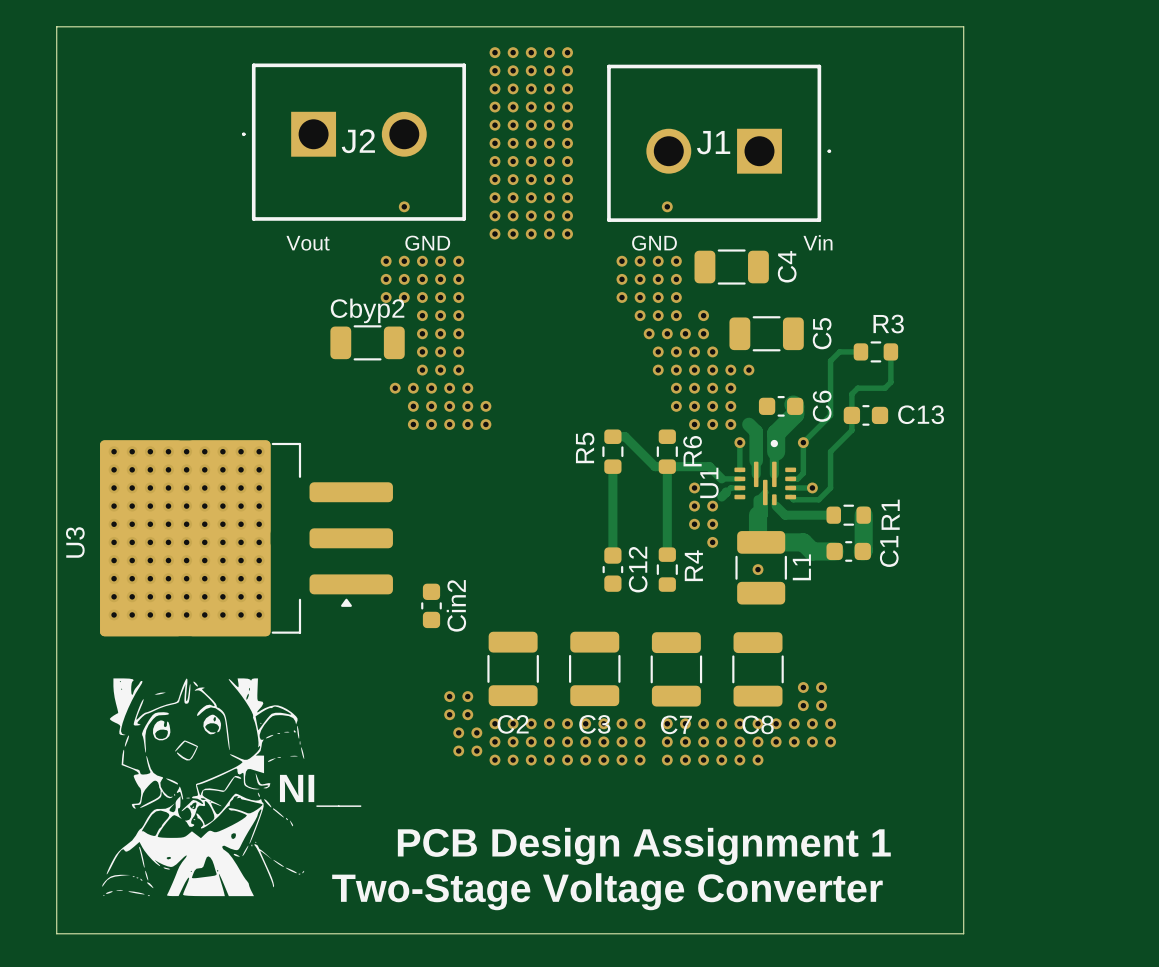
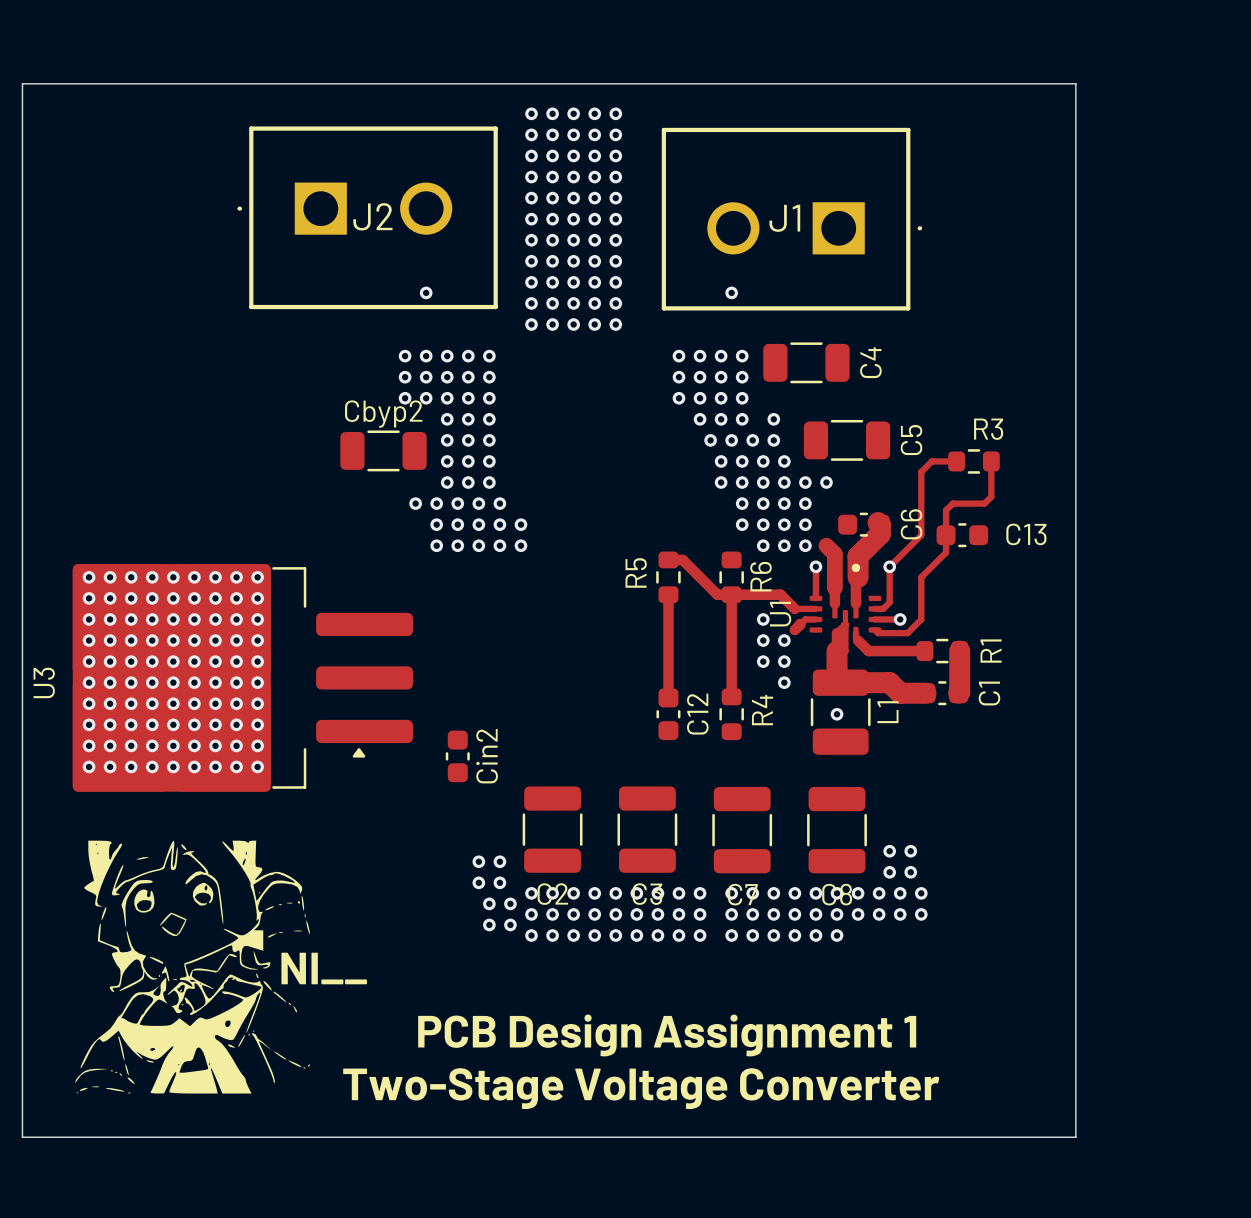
text: Vin (817, 242) -> none
text: Vout (308, 243) -> none
text: GND (427, 243) -> none
text: GND (654, 243) -> none

